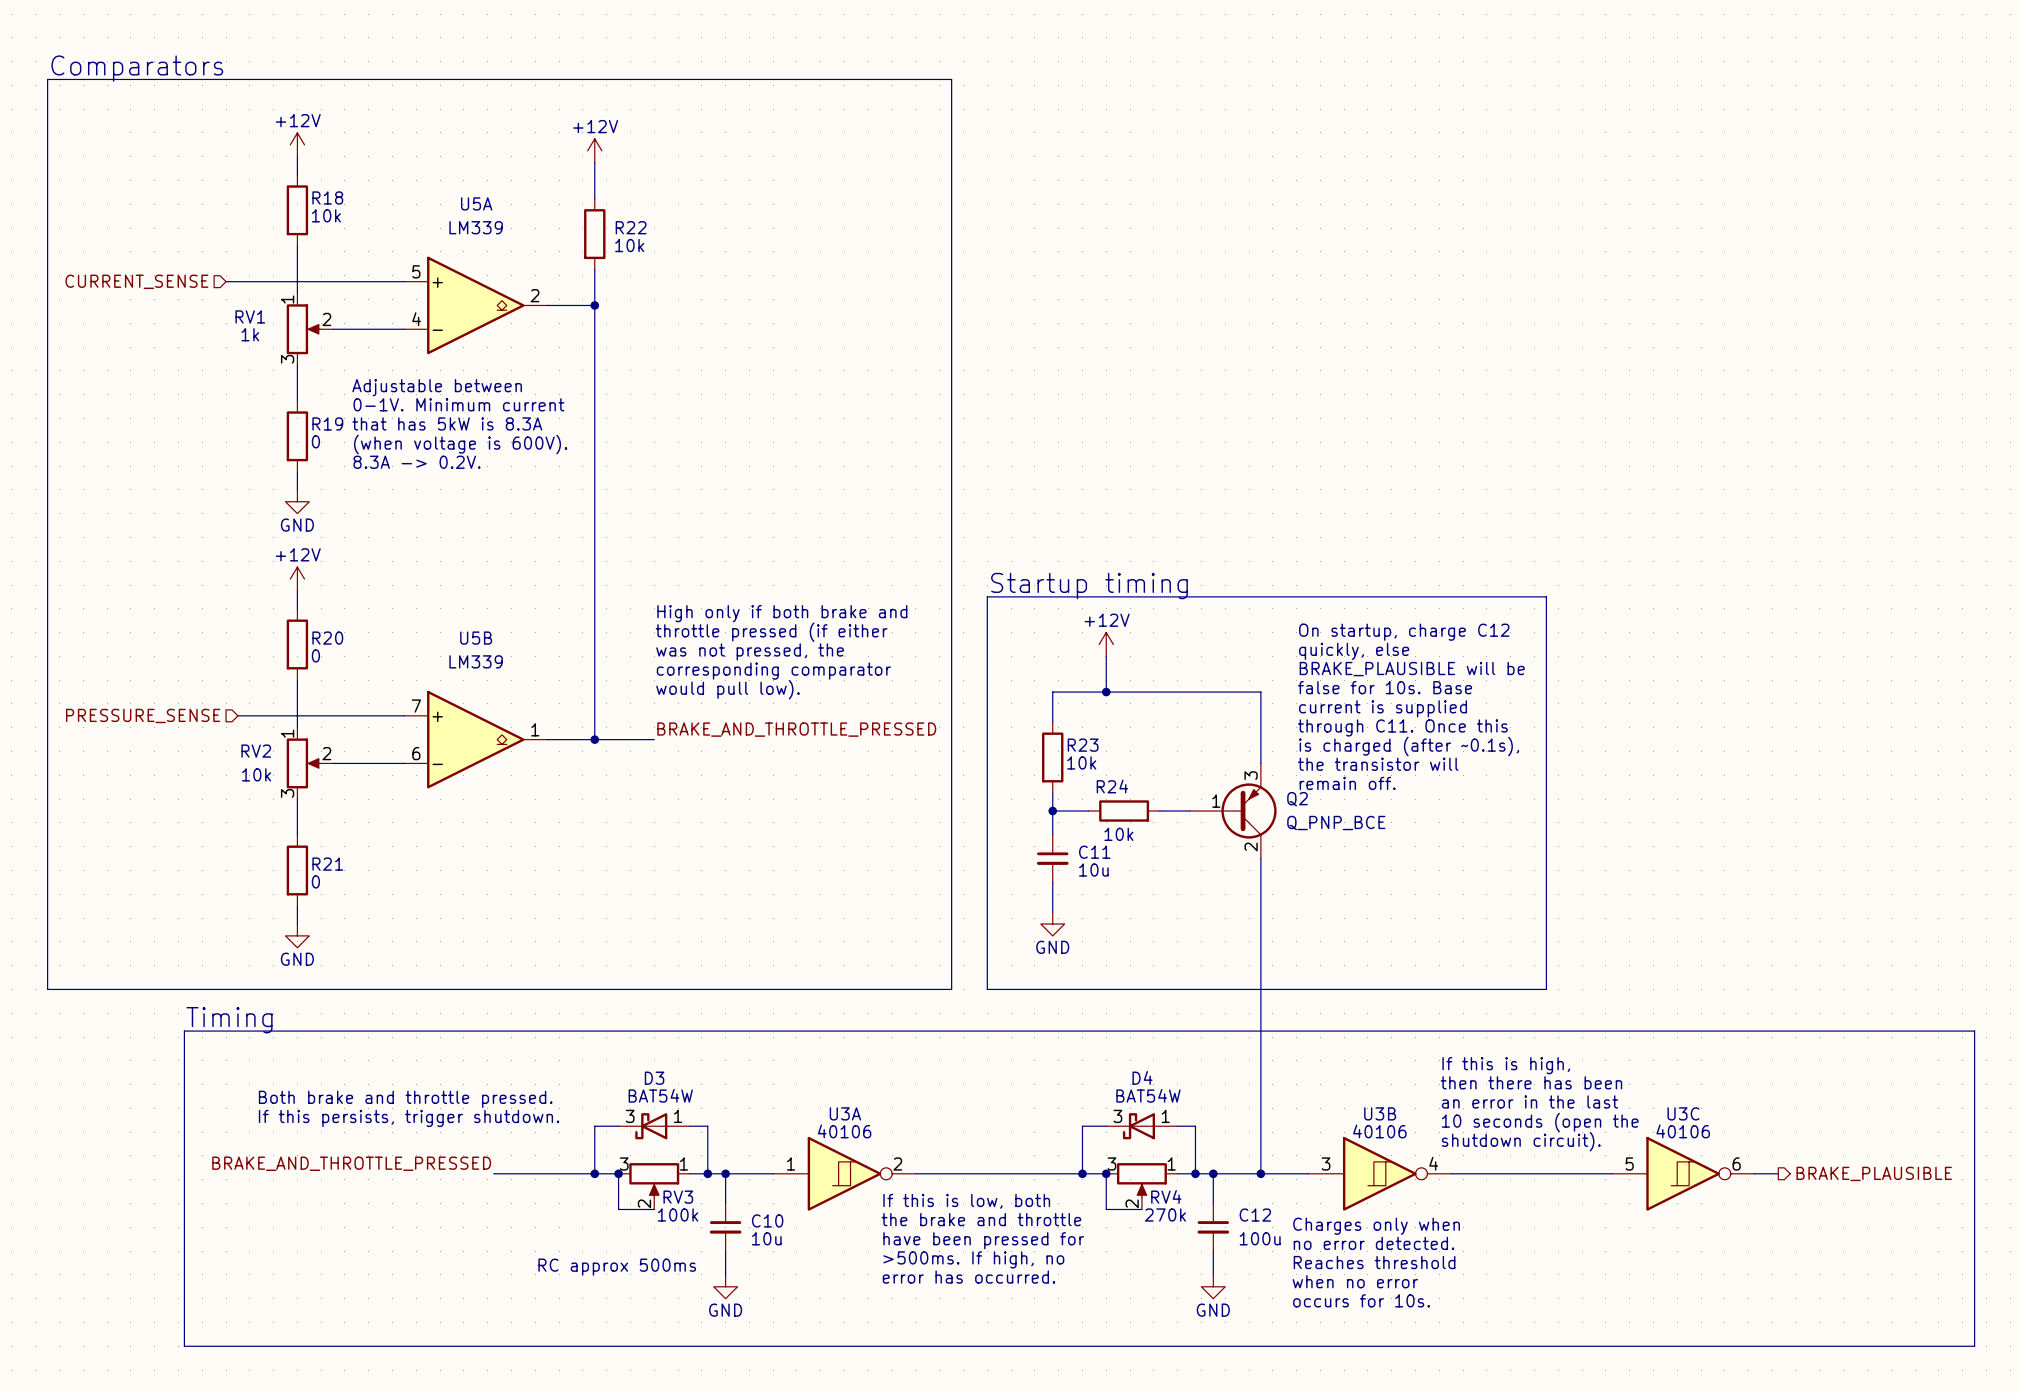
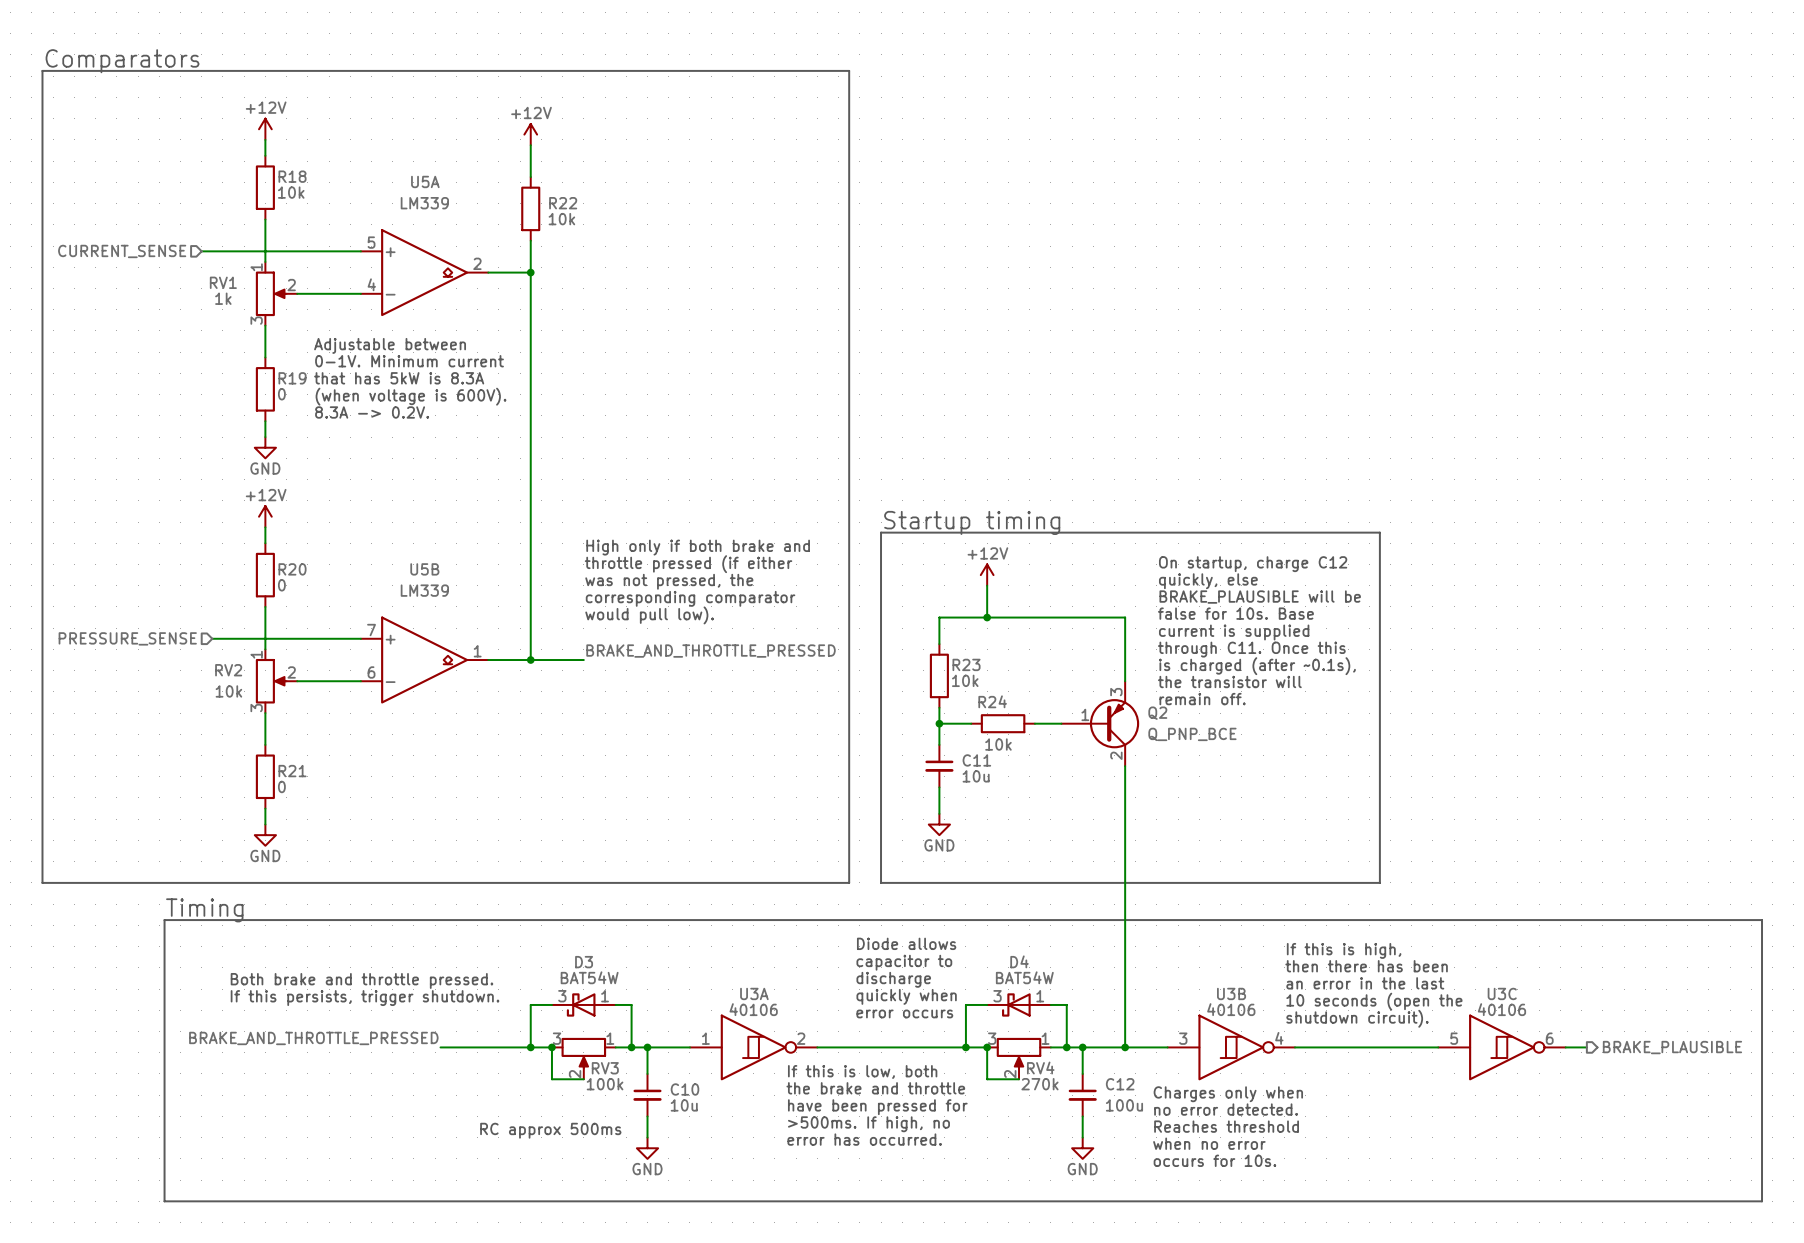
text: none -> Diode allows (906, 943)
text: none -> capacitor to (904, 962)
text: none -> discharge (893, 979)
text: none -> quickly when (906, 996)
text: none -> error occurs (904, 1013)

